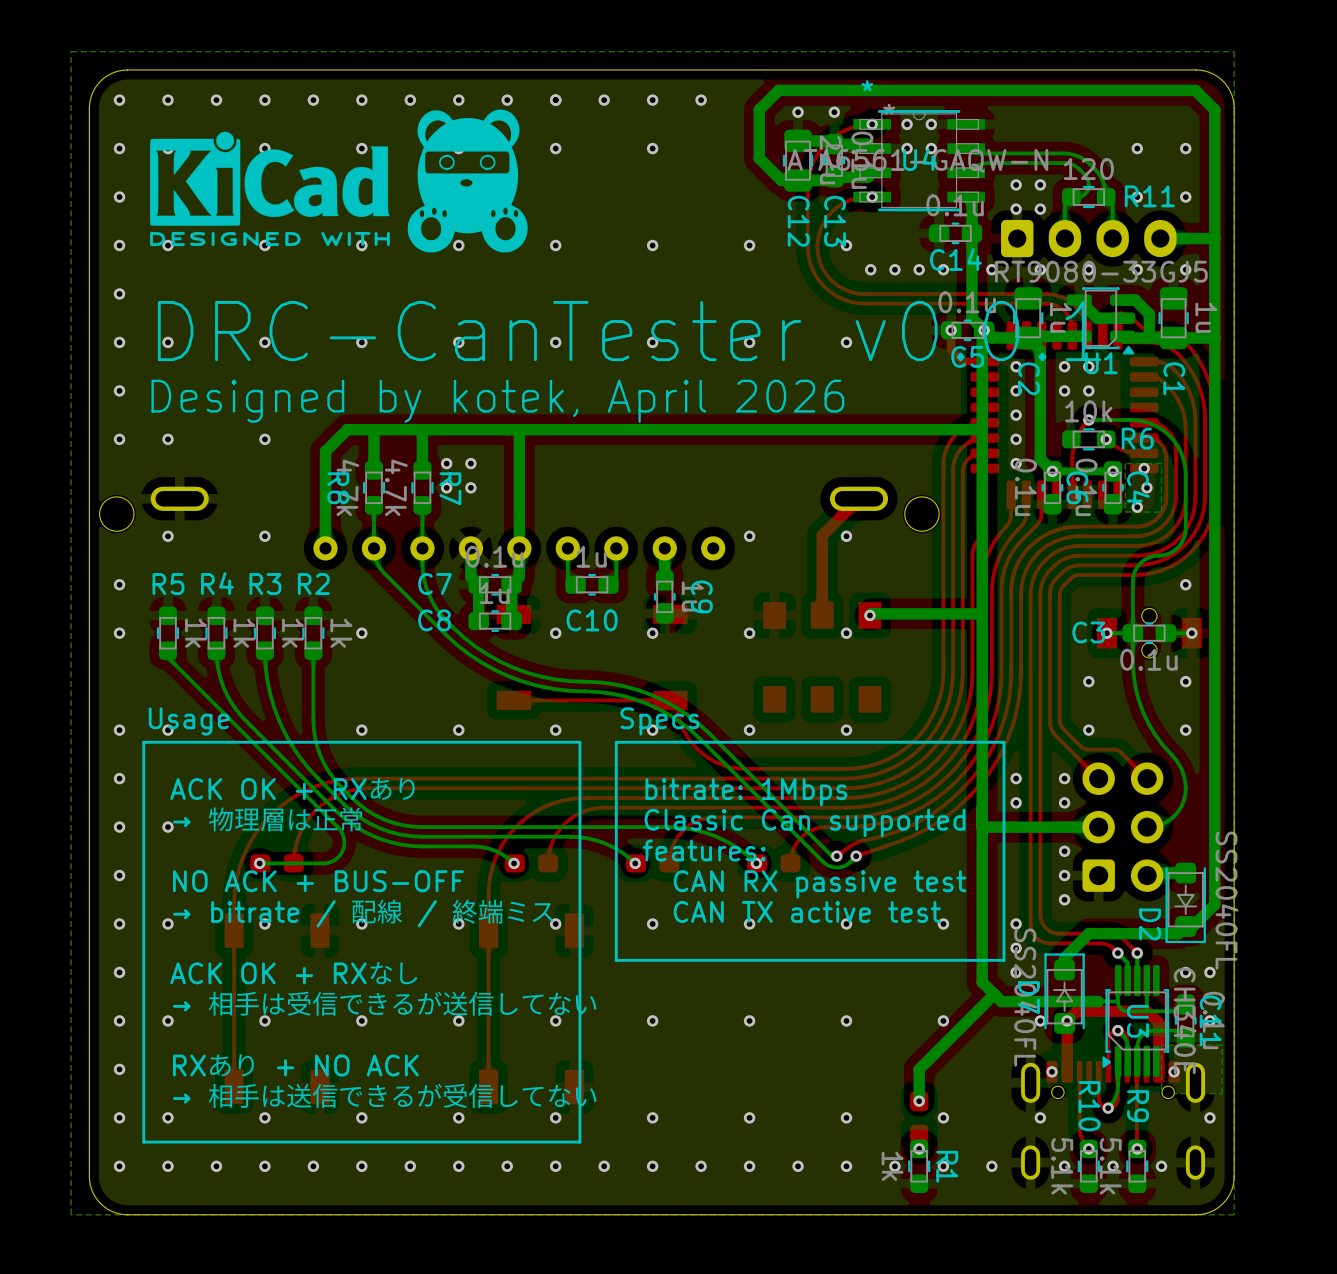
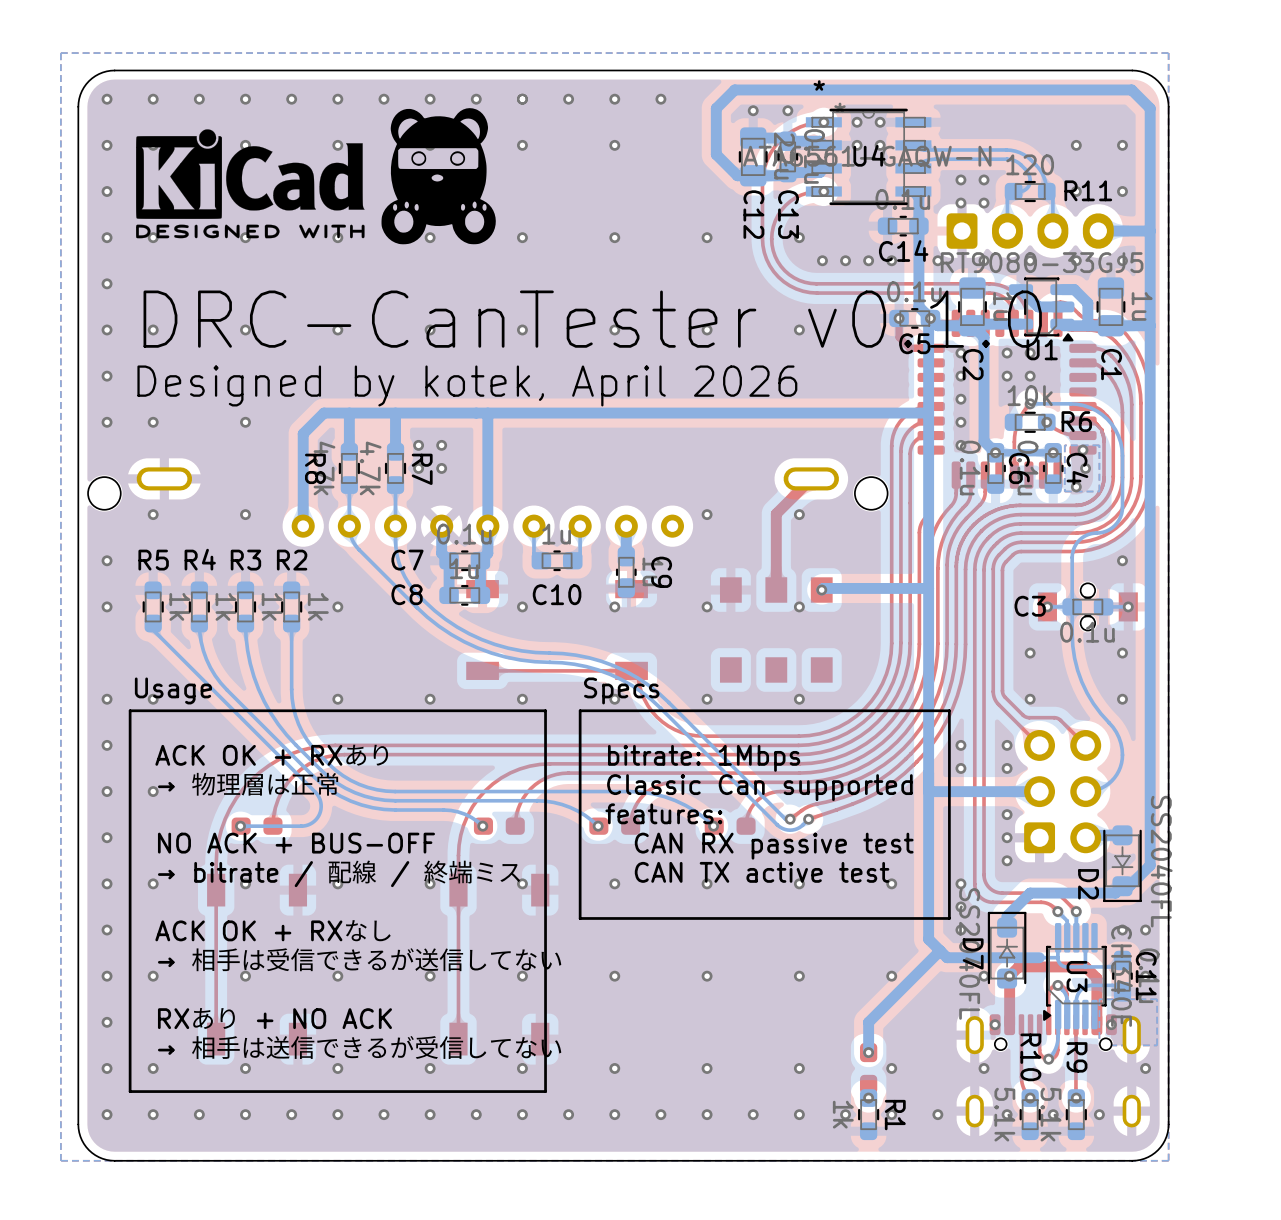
text: DRC-CanTester v0.0.1 (629, 331) -> DRC-CanTester v0.1.0 (592, 319)

